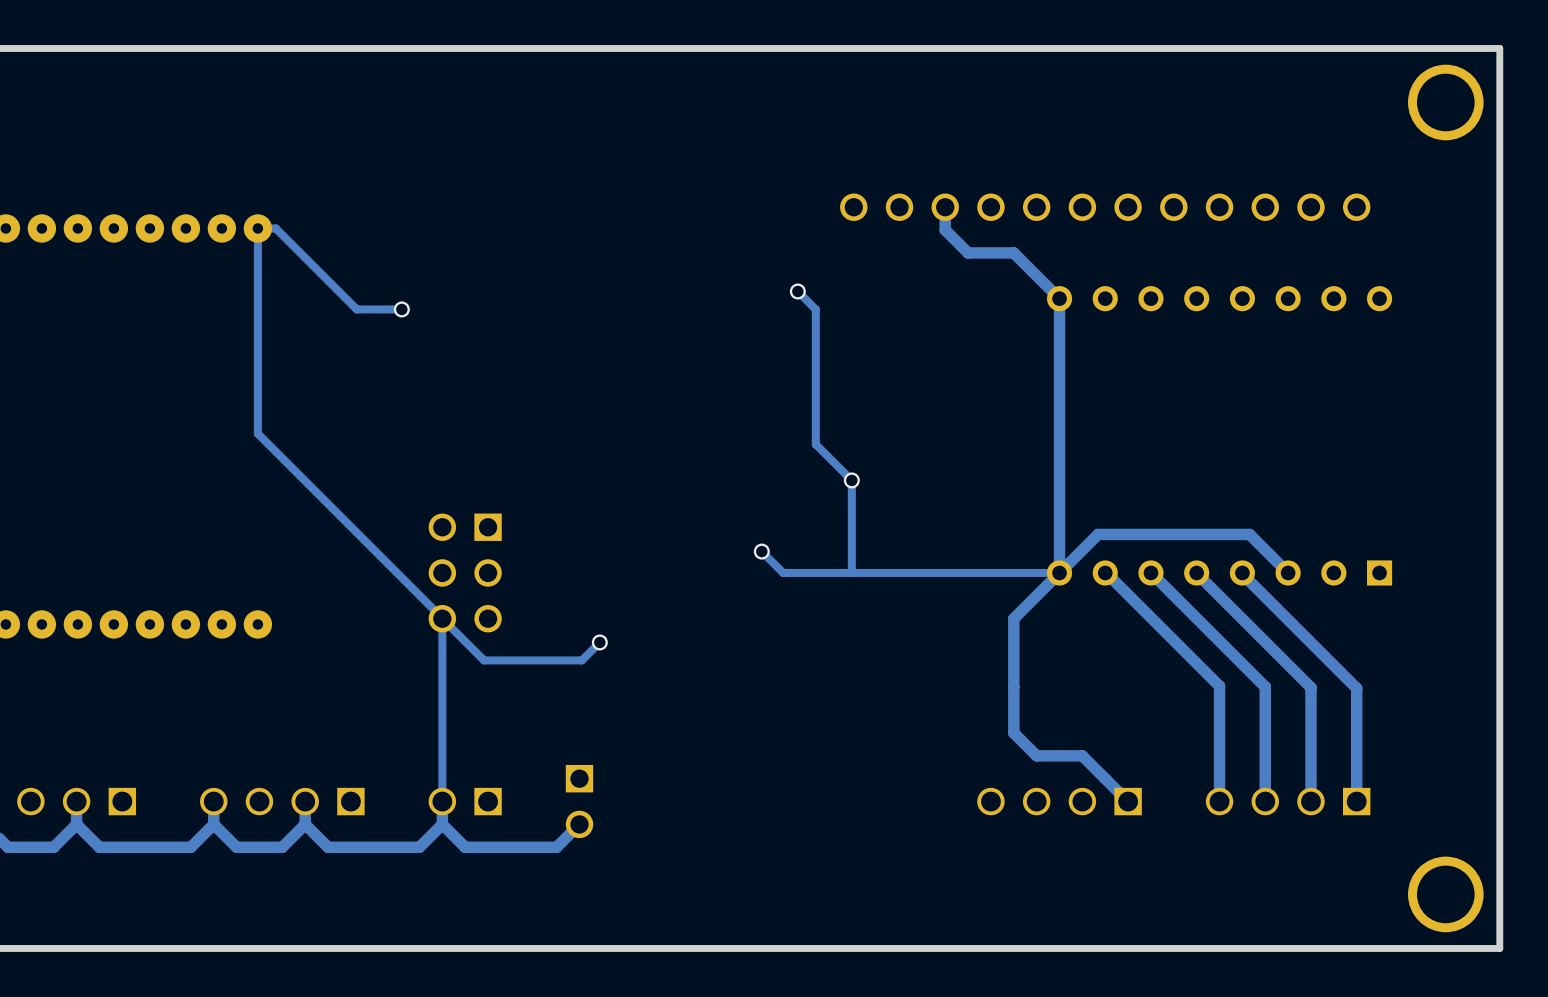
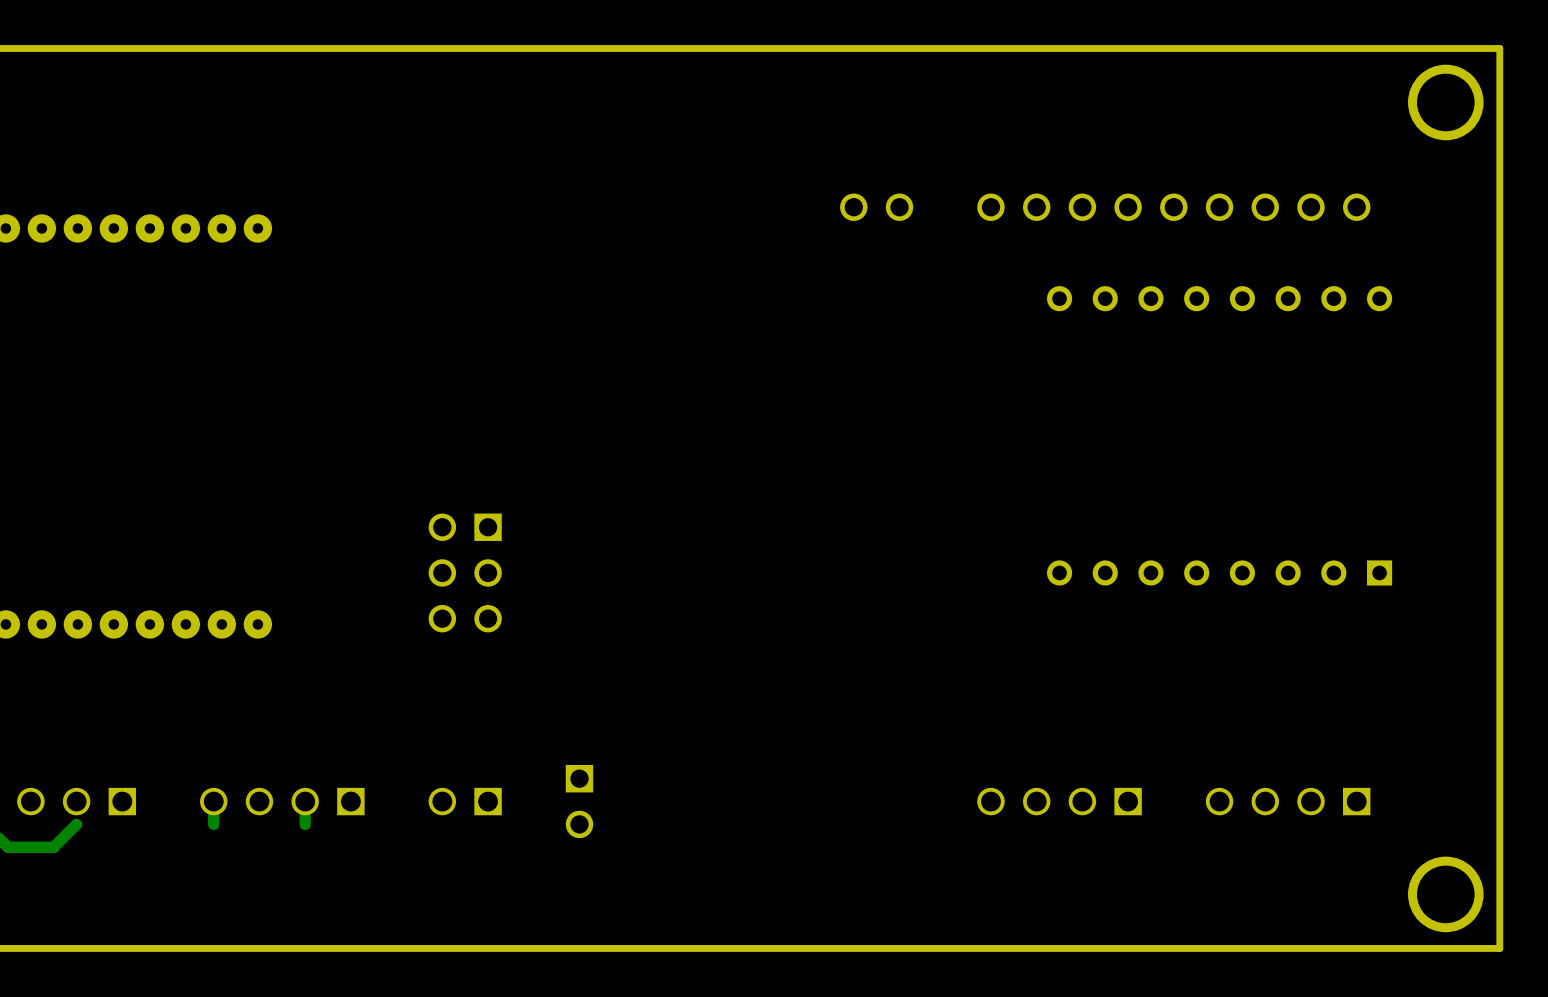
track: (945, 207) (945, 230) (968, 252) (1013, 252) (1059, 298) (1059, 572) (783, 572) (761, 551) -> none
part: (945, 207) -> none
track: (797, 291) (815, 309) (815, 444) (851, 480) (851, 572) -> none
via: (797, 291) -> none
track: (401, 309) (356, 309) (275, 228) (257, 228) (257, 433) (442, 618) (442, 824) -> none
via: (401, 309) -> none
via: (851, 480) -> none
via: (761, 551) -> none
track: (1105, 572) (1219, 686) (1219, 801) -> none
track: (1150, 572) (1265, 686) (1265, 801) -> none
track: (1196, 572) (1310, 687) (1310, 801) -> none
track: (1242, 572) (1356, 688) (1356, 801) -> none
track: (1288, 572) (1249, 534) (1098, 534) (1013, 618) (1013, 732) (1036, 755) (1082, 755) (1128, 801) -> none
track: (442, 618) (484, 660) (581, 660) (599, 642) -> none
via: (599, 642) -> none
track: (76, 801) (76, 824) (99, 847) (190, 847) (213, 824) (236, 847) (282, 847) (305, 824) (328, 847) (419, 847) (442, 824) -> none
track: (579, 824) (556, 847) (465, 847) (442, 824) -> none

